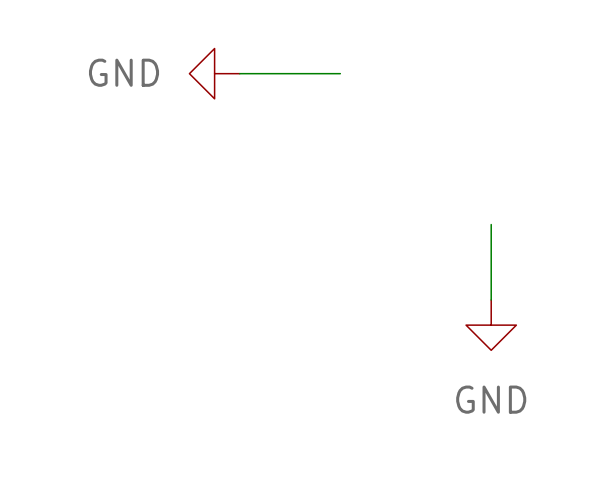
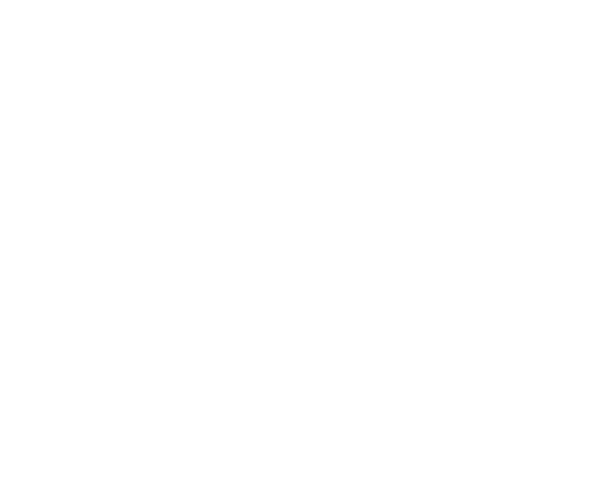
power symbol: GND (214, 73) -> none
wire: (239, 73) (340, 73) -> none
wire: (491, 224) (491, 299) -> none
power symbol: GND (491, 325) -> none

